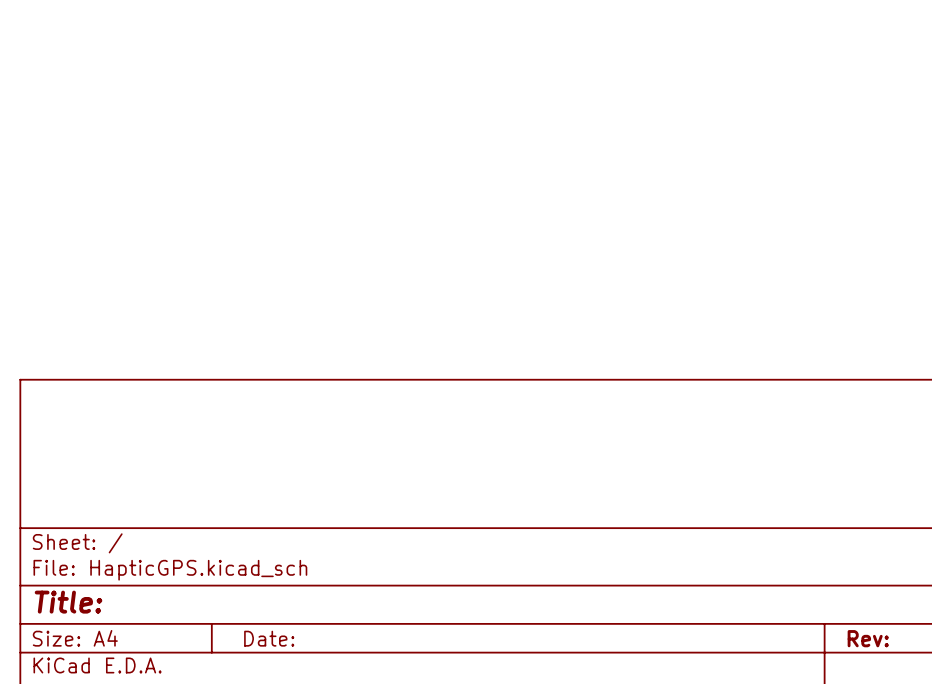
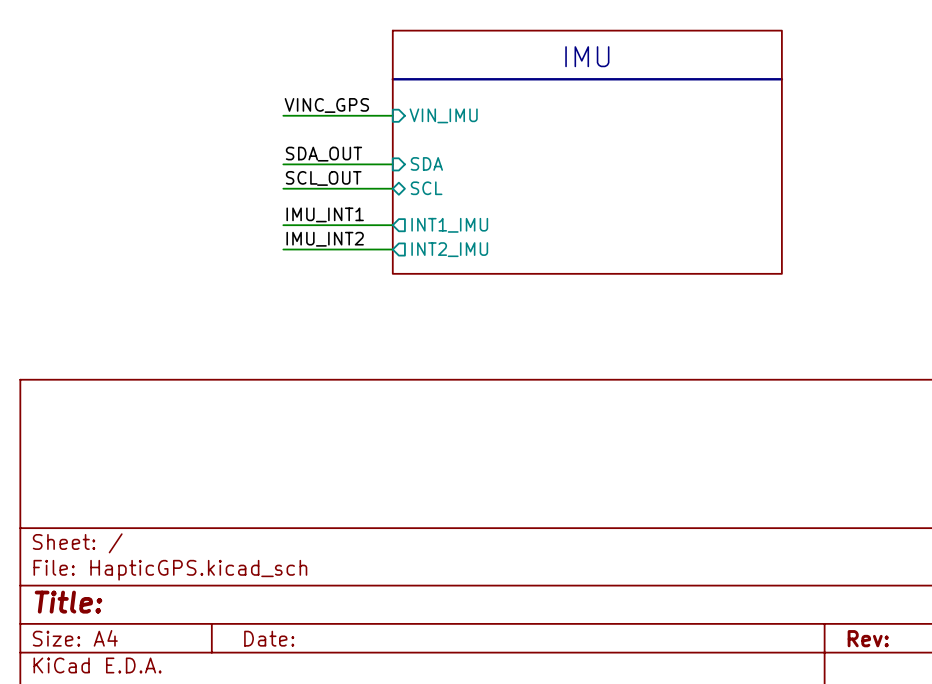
text: none -> IMU (587, 56)
line: none -> (392, 79) (781, 79)
label: none -> VINC_GPS (326, 105)
wire: none -> (283, 115) (392, 115)
sheet pin: none -> VIN_IMU (443, 115)
sheet: none -> (587, 152)
label: none -> SDA_OUT (323, 154)
sheet pin: none -> SDA (426, 163)
wire: none -> (283, 164) (392, 164)
label: none -> SCL_OUT (323, 178)
wire: none -> (283, 188) (392, 188)
sheet pin: none -> SCL (426, 188)
label: none -> IMU_INT1 (325, 214)
wire: none -> (283, 225) (392, 225)
sheet pin: none -> INT1_IMU (449, 225)
label: none -> IMU_INT2 (325, 239)
wire: none -> (283, 249) (392, 249)
sheet pin: none -> INT2_IMU (449, 249)

